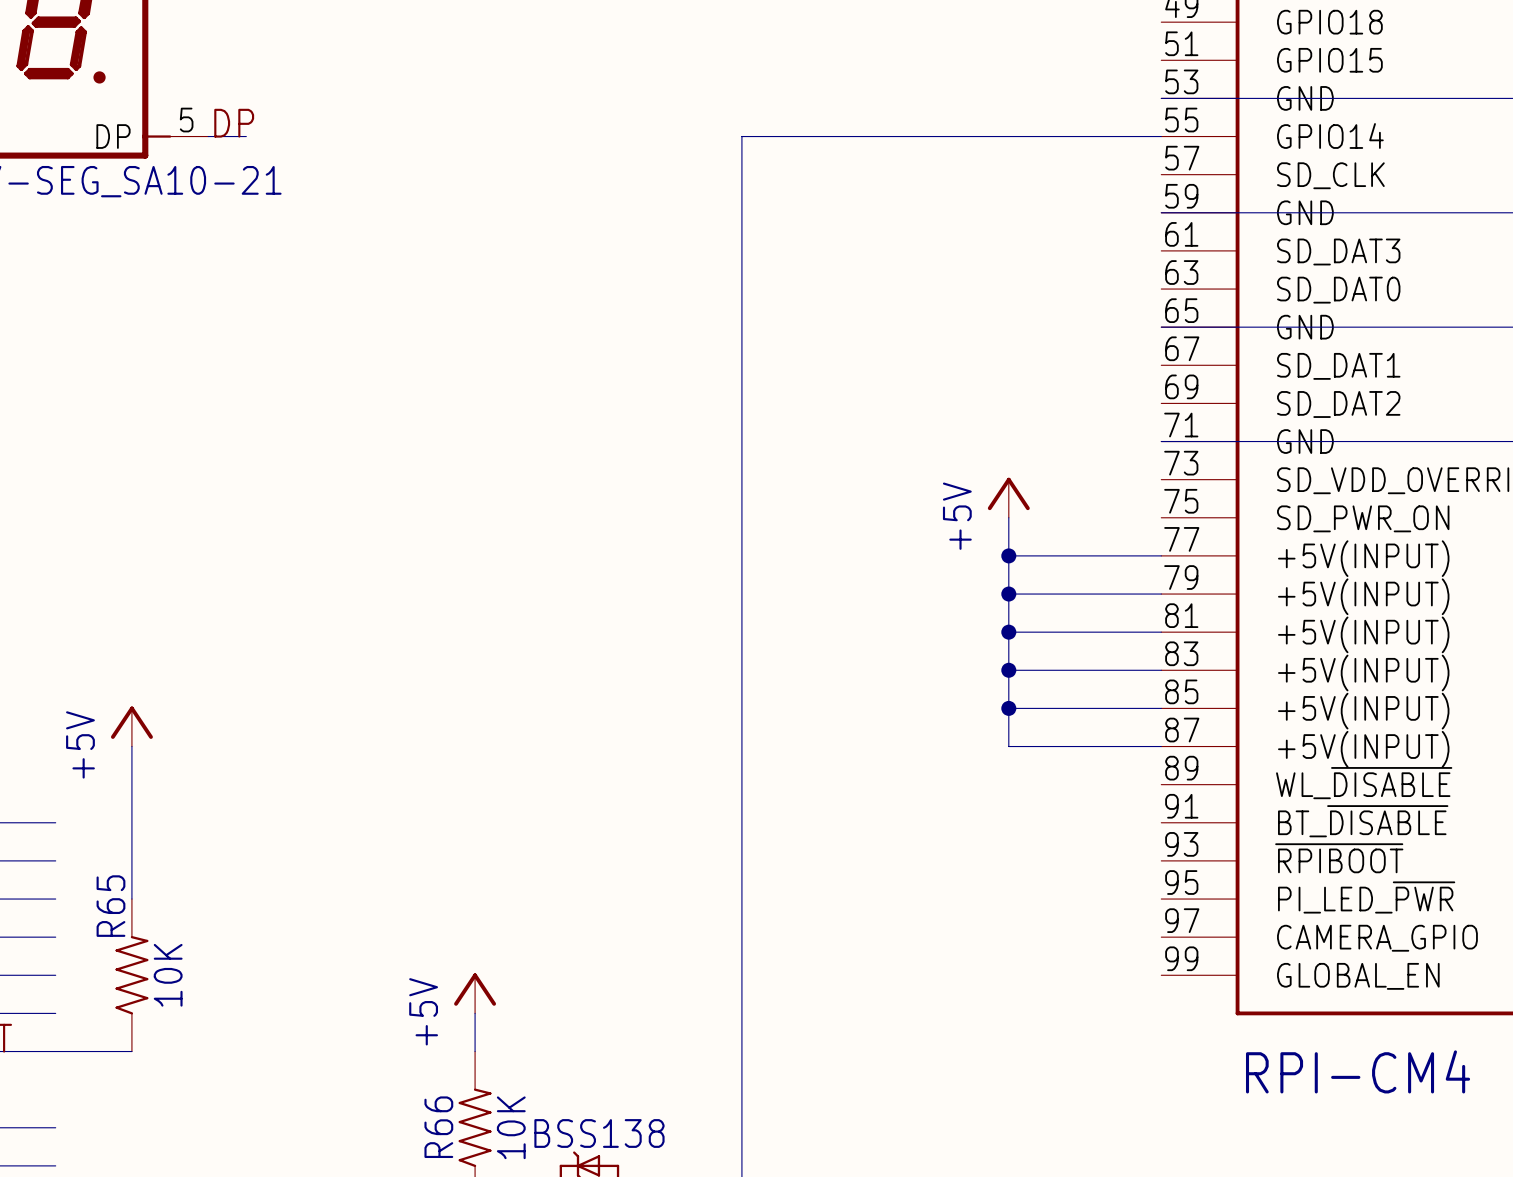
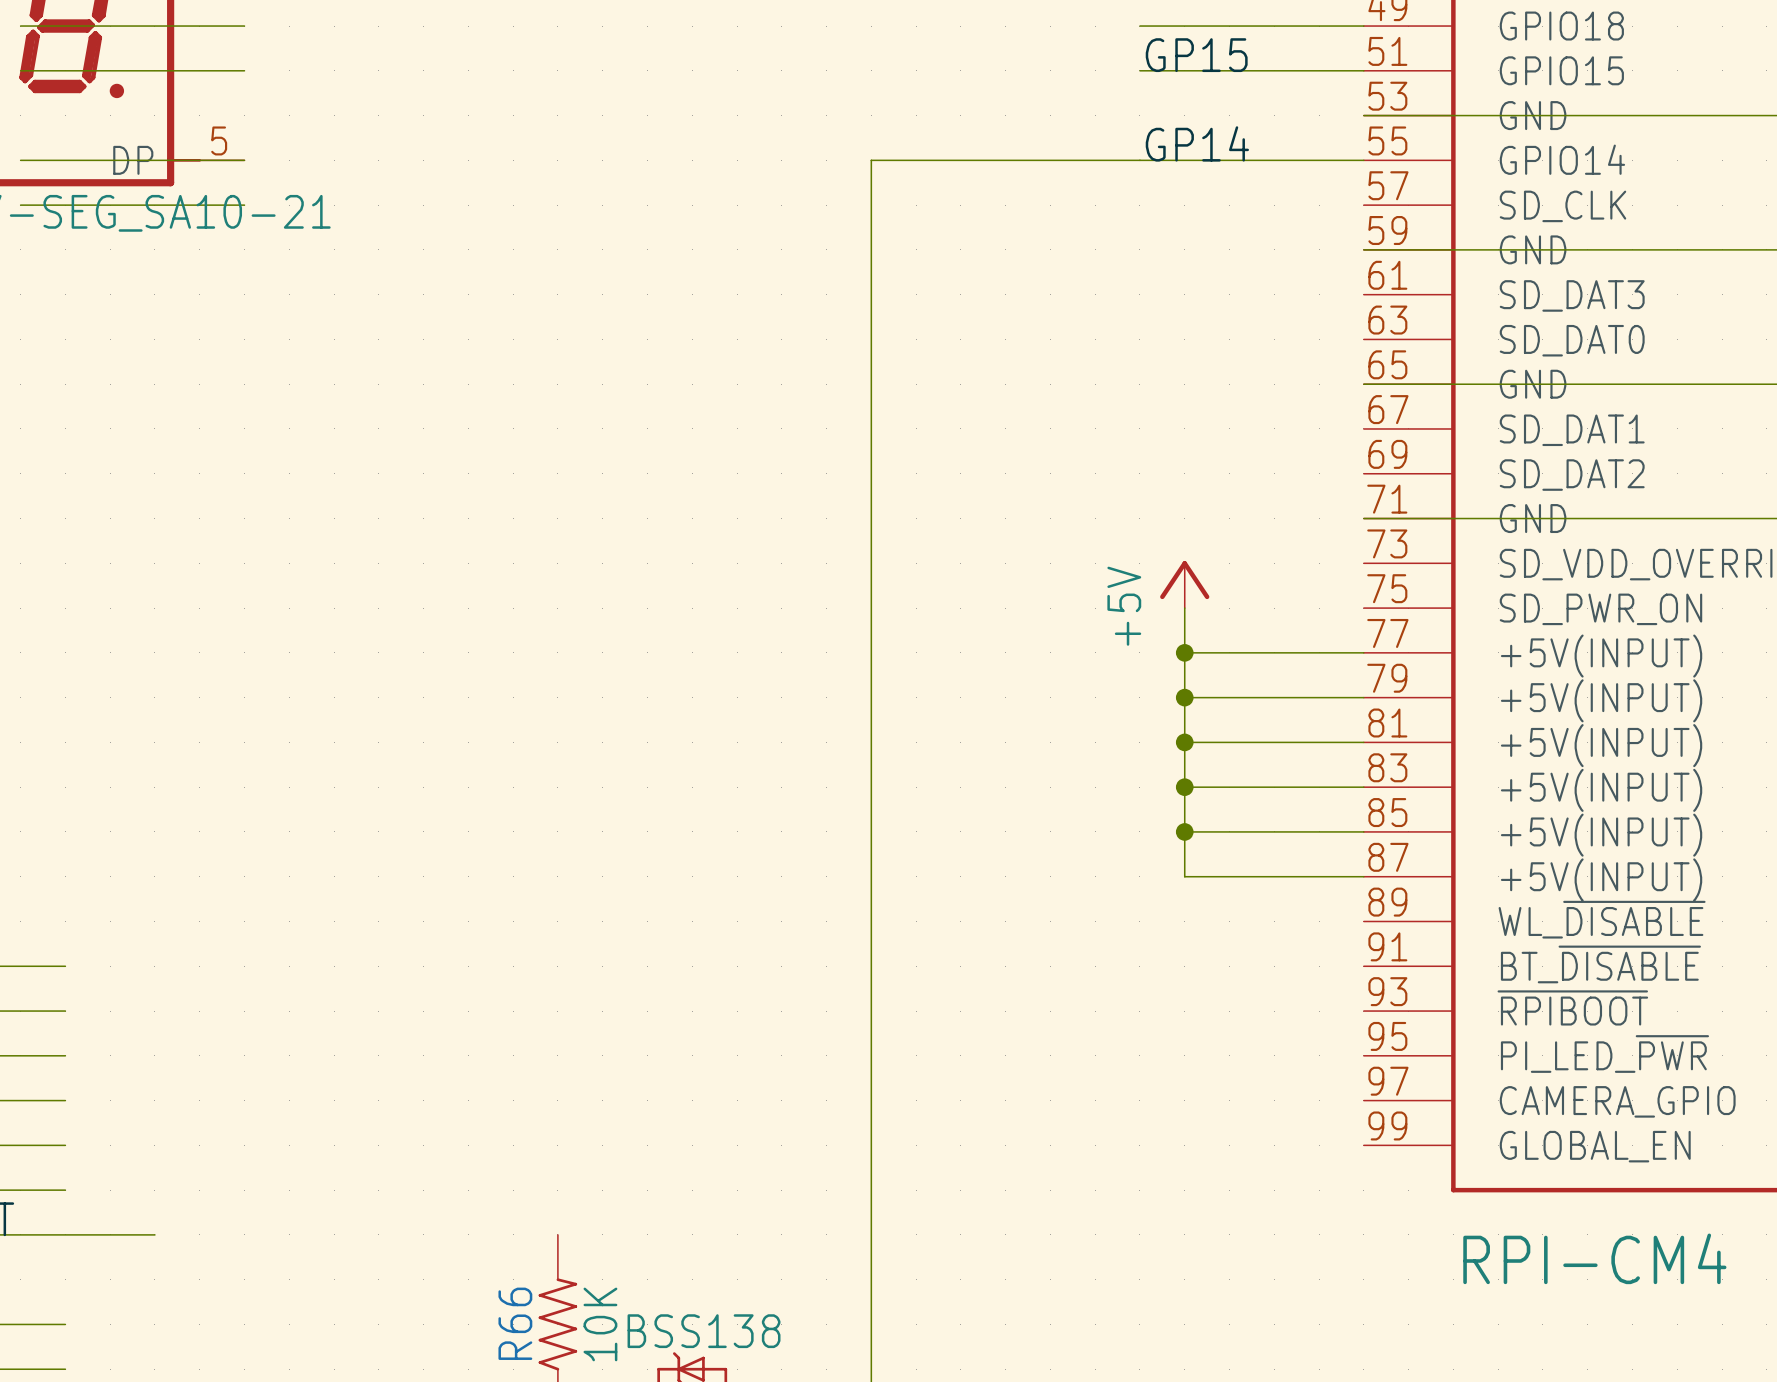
wire: none -> (20, 26) (244, 26)
wire: none -> (1139, 26) (1363, 26)
label: none -> GP15 (1196, 55)
wire: none -> (20, 70) (244, 70)
wire: none -> (1139, 70) (1363, 70)
label: none -> GP14 (1197, 143)
label: DP (234, 123) -> none
wire: (208, 136) (246, 136) -> (244, 160) (20, 160)
wire: none -> (20, 205) (244, 205)
power symbol: +5V (131, 726) -> none
wire: (131, 746) (131, 899) -> none
R65: 10K (131, 975) -> none
power symbol: +5V (475, 993) -> none
wire: (475, 1013) (475, 1051) -> none

